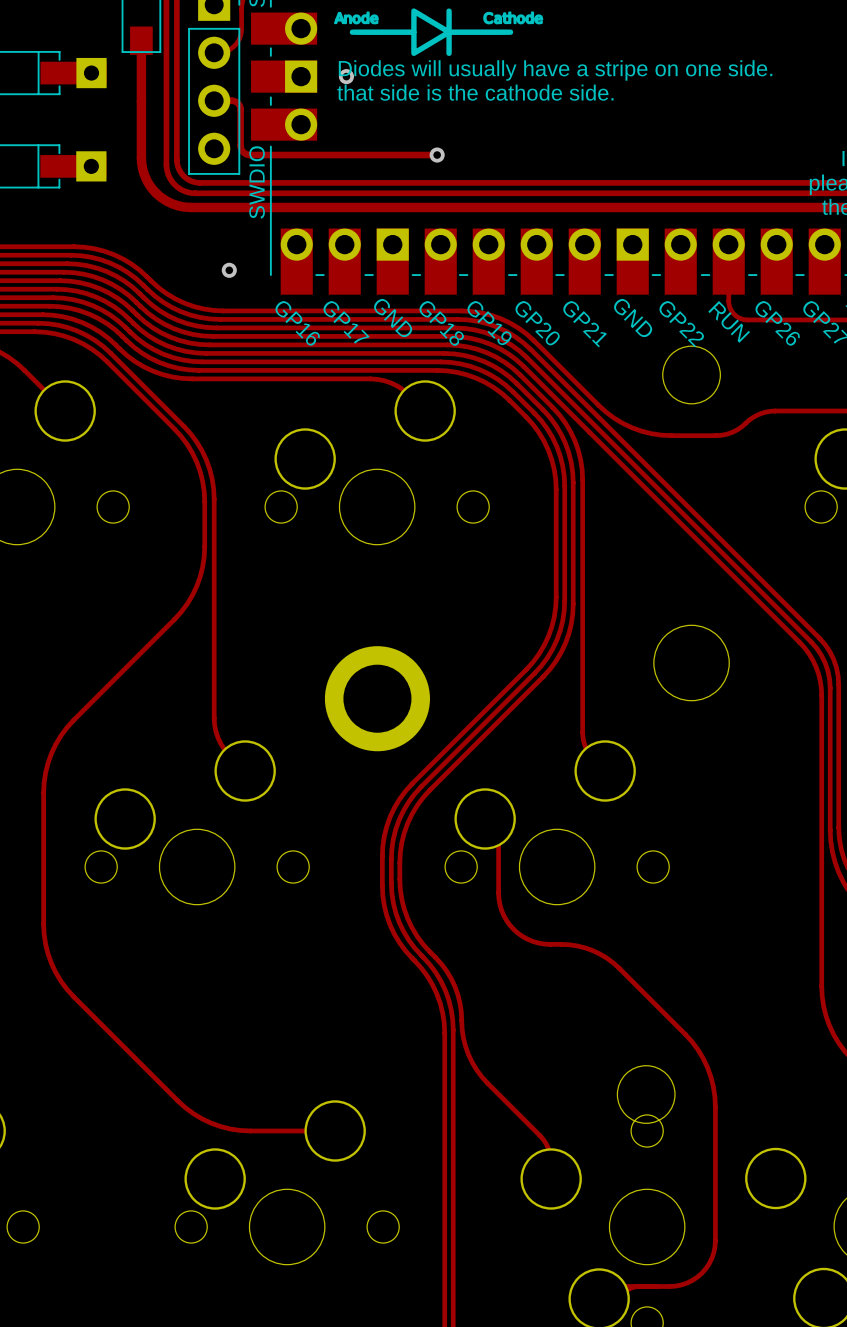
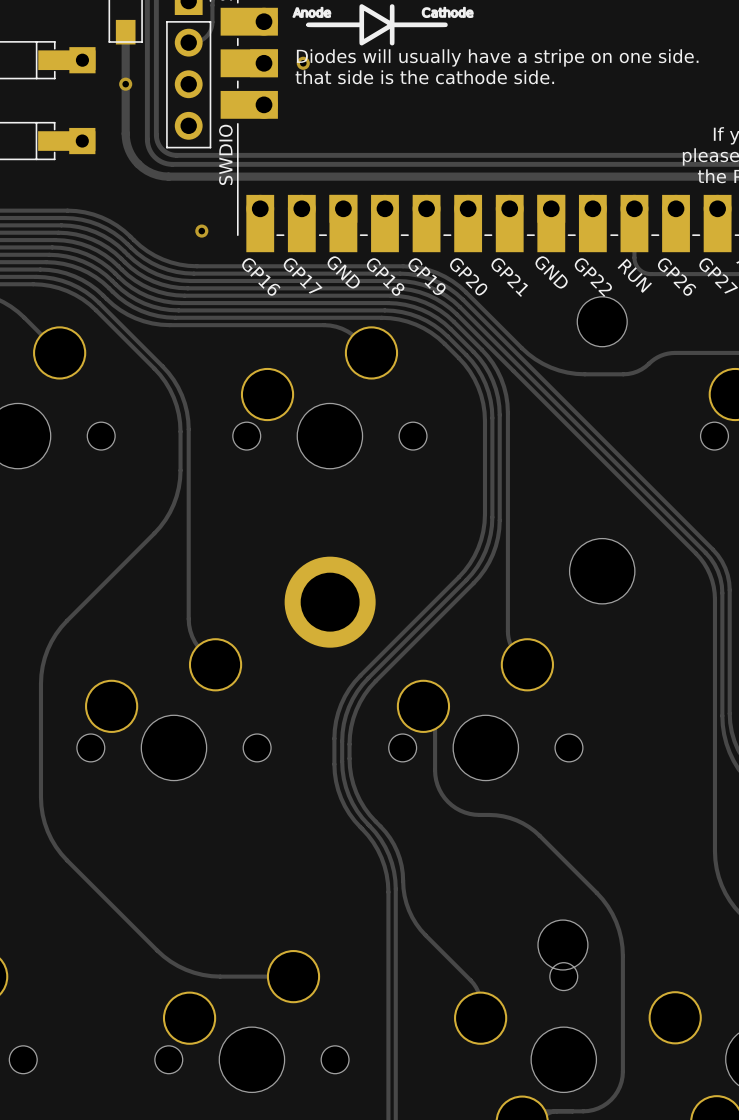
via: none -> (125, 84)
track: (214, 100) (232, 100) (239, 105) (240, 146) (242, 151) (247, 154) (437, 155) -> none
via: (437, 155) -> none

